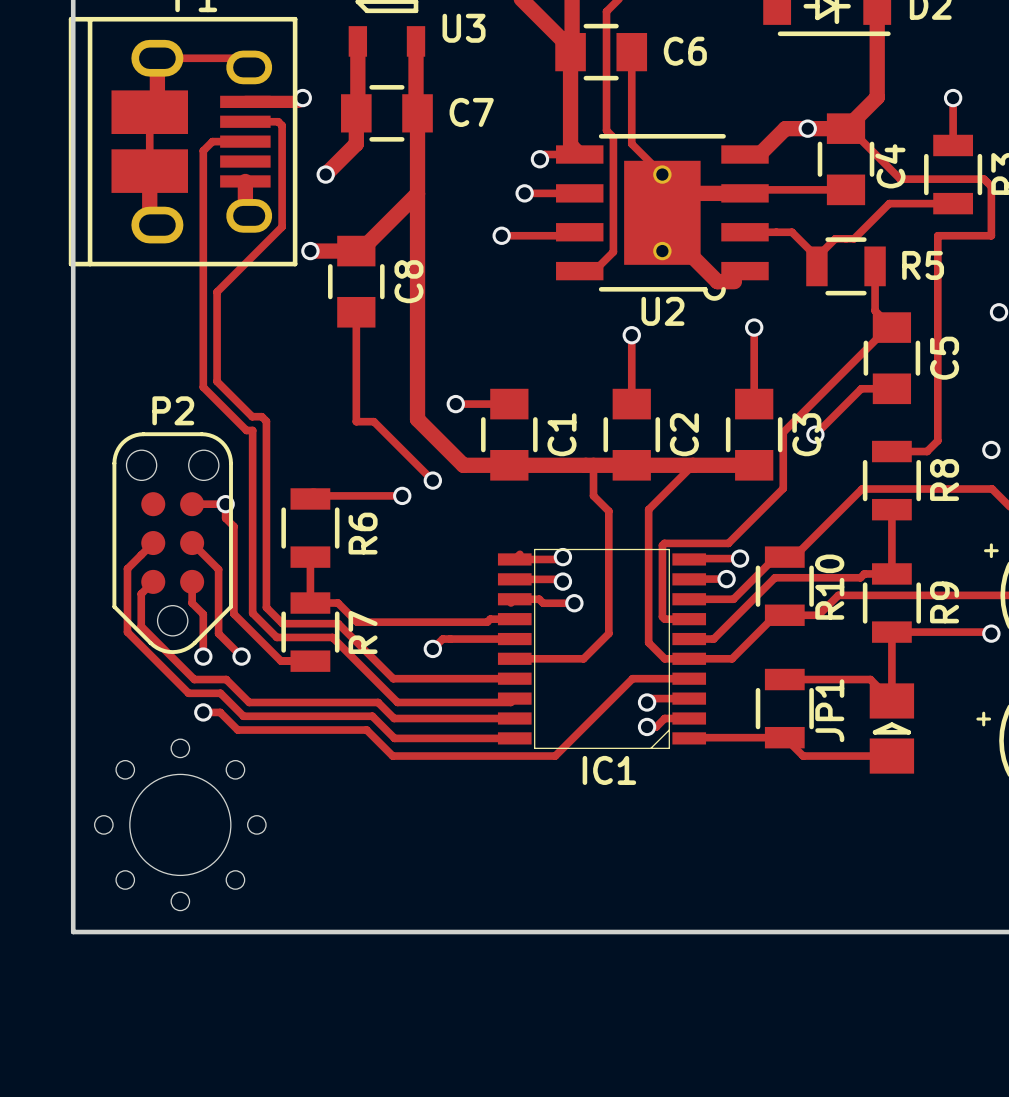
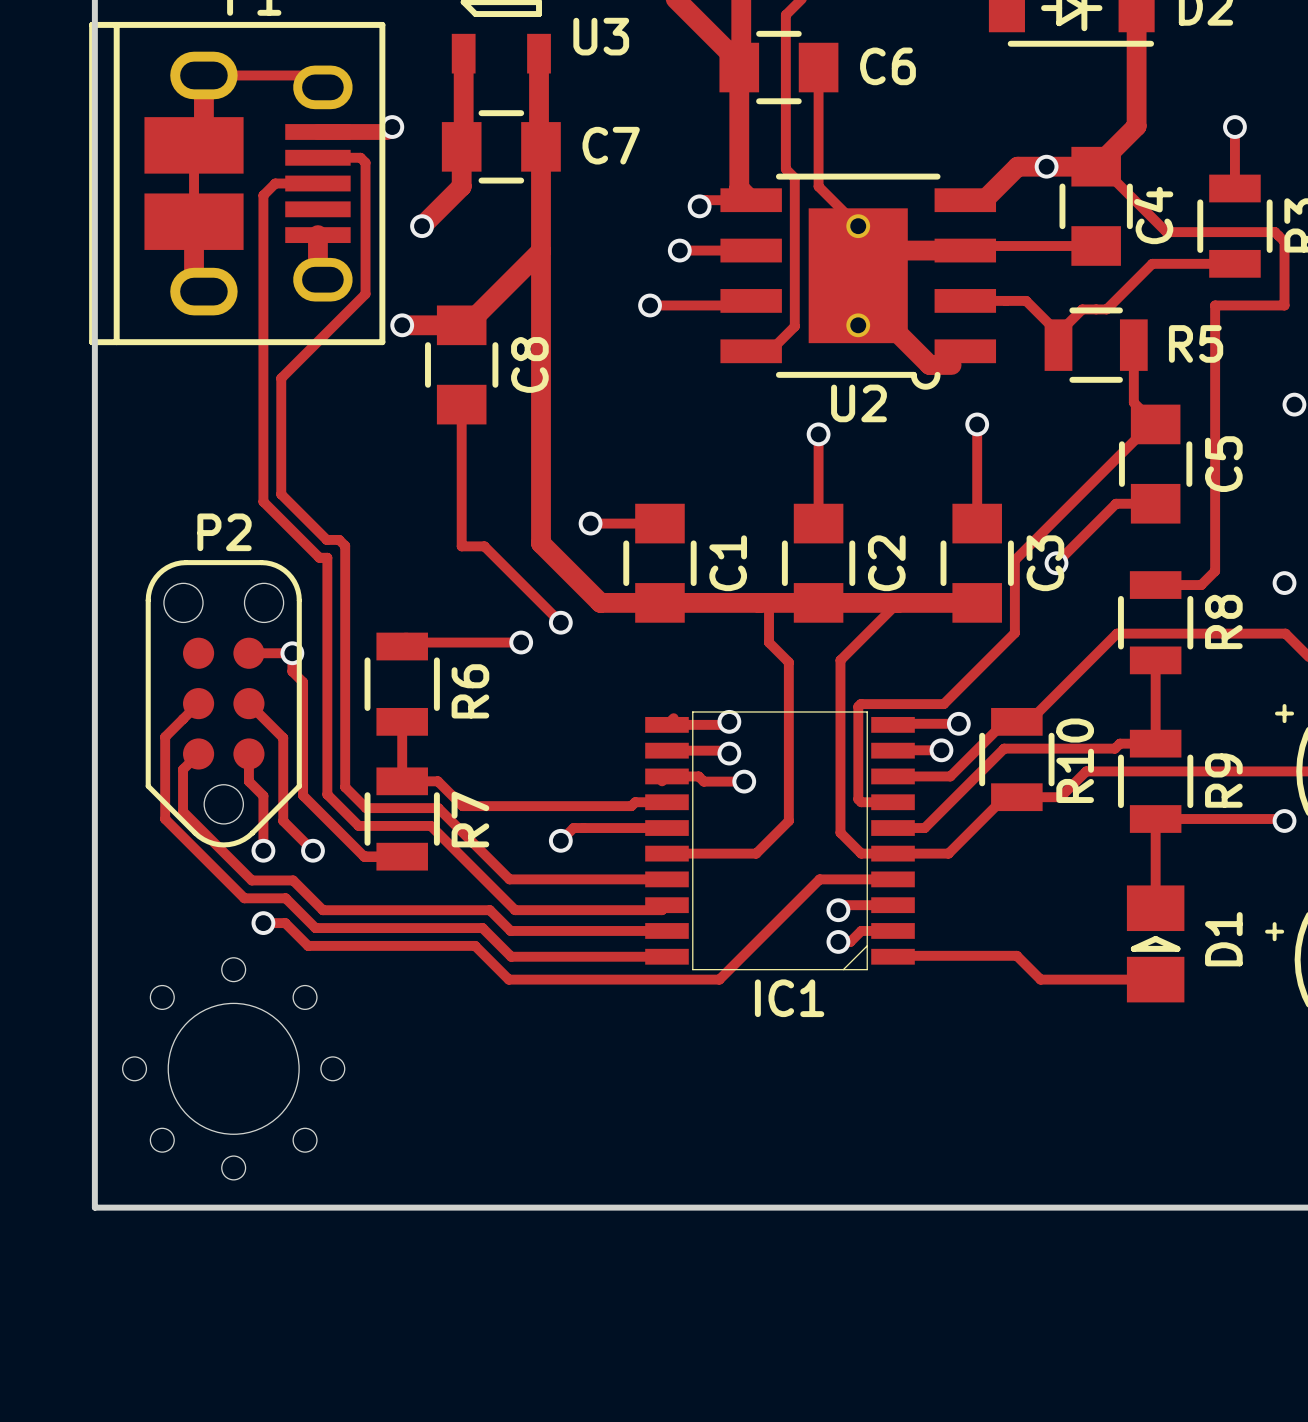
track: (784, 679) (870, 679) (891, 700) -> none
JP1: (784, 708) -> none
D1 name: none -> D1 (1223, 939)

